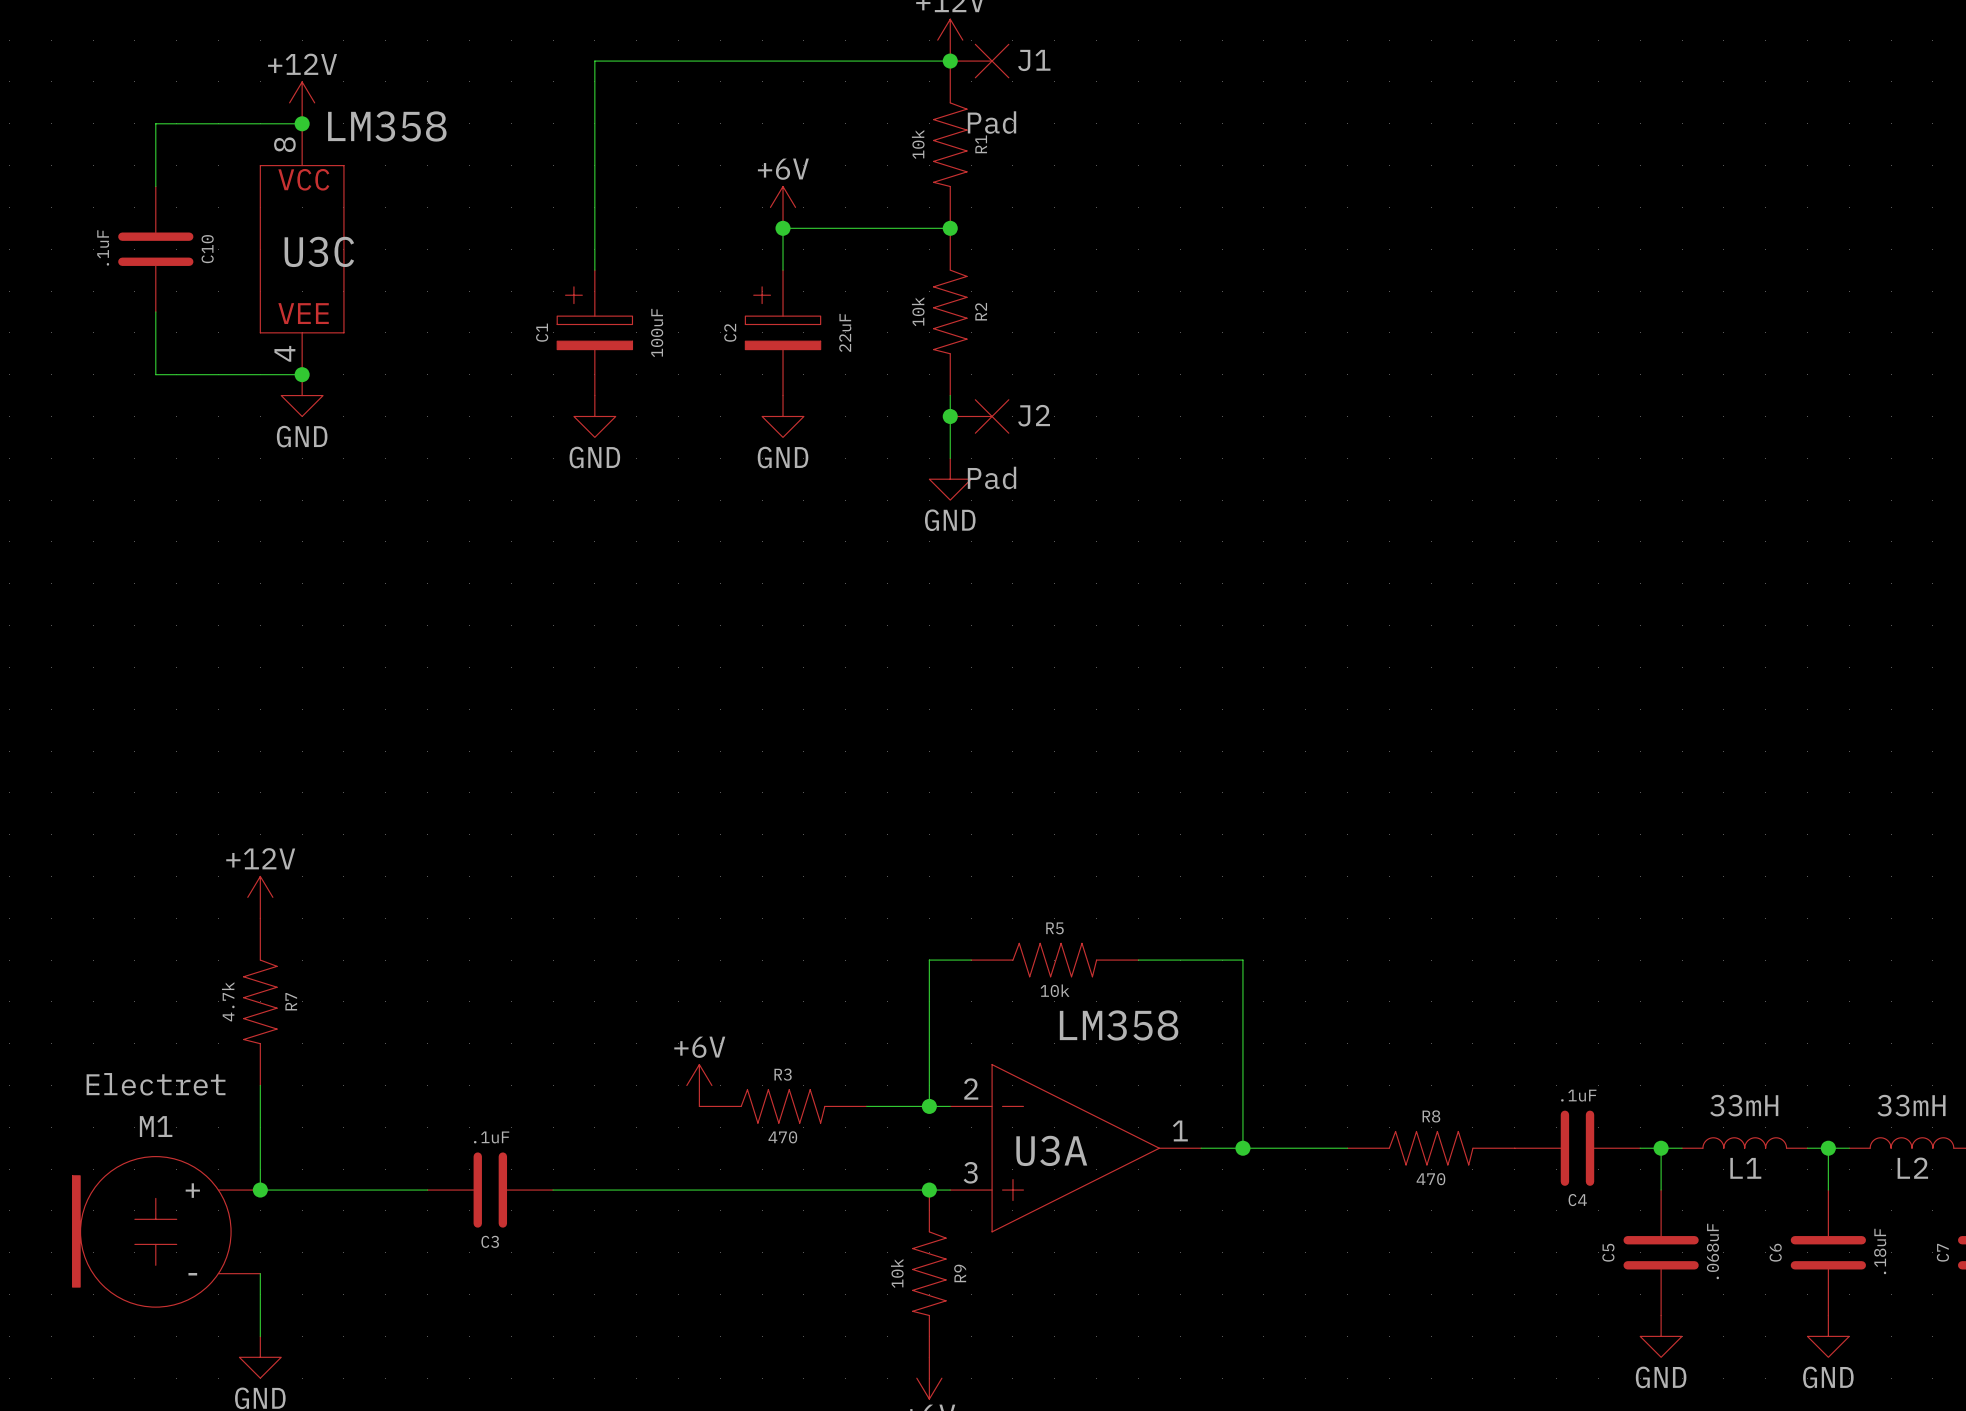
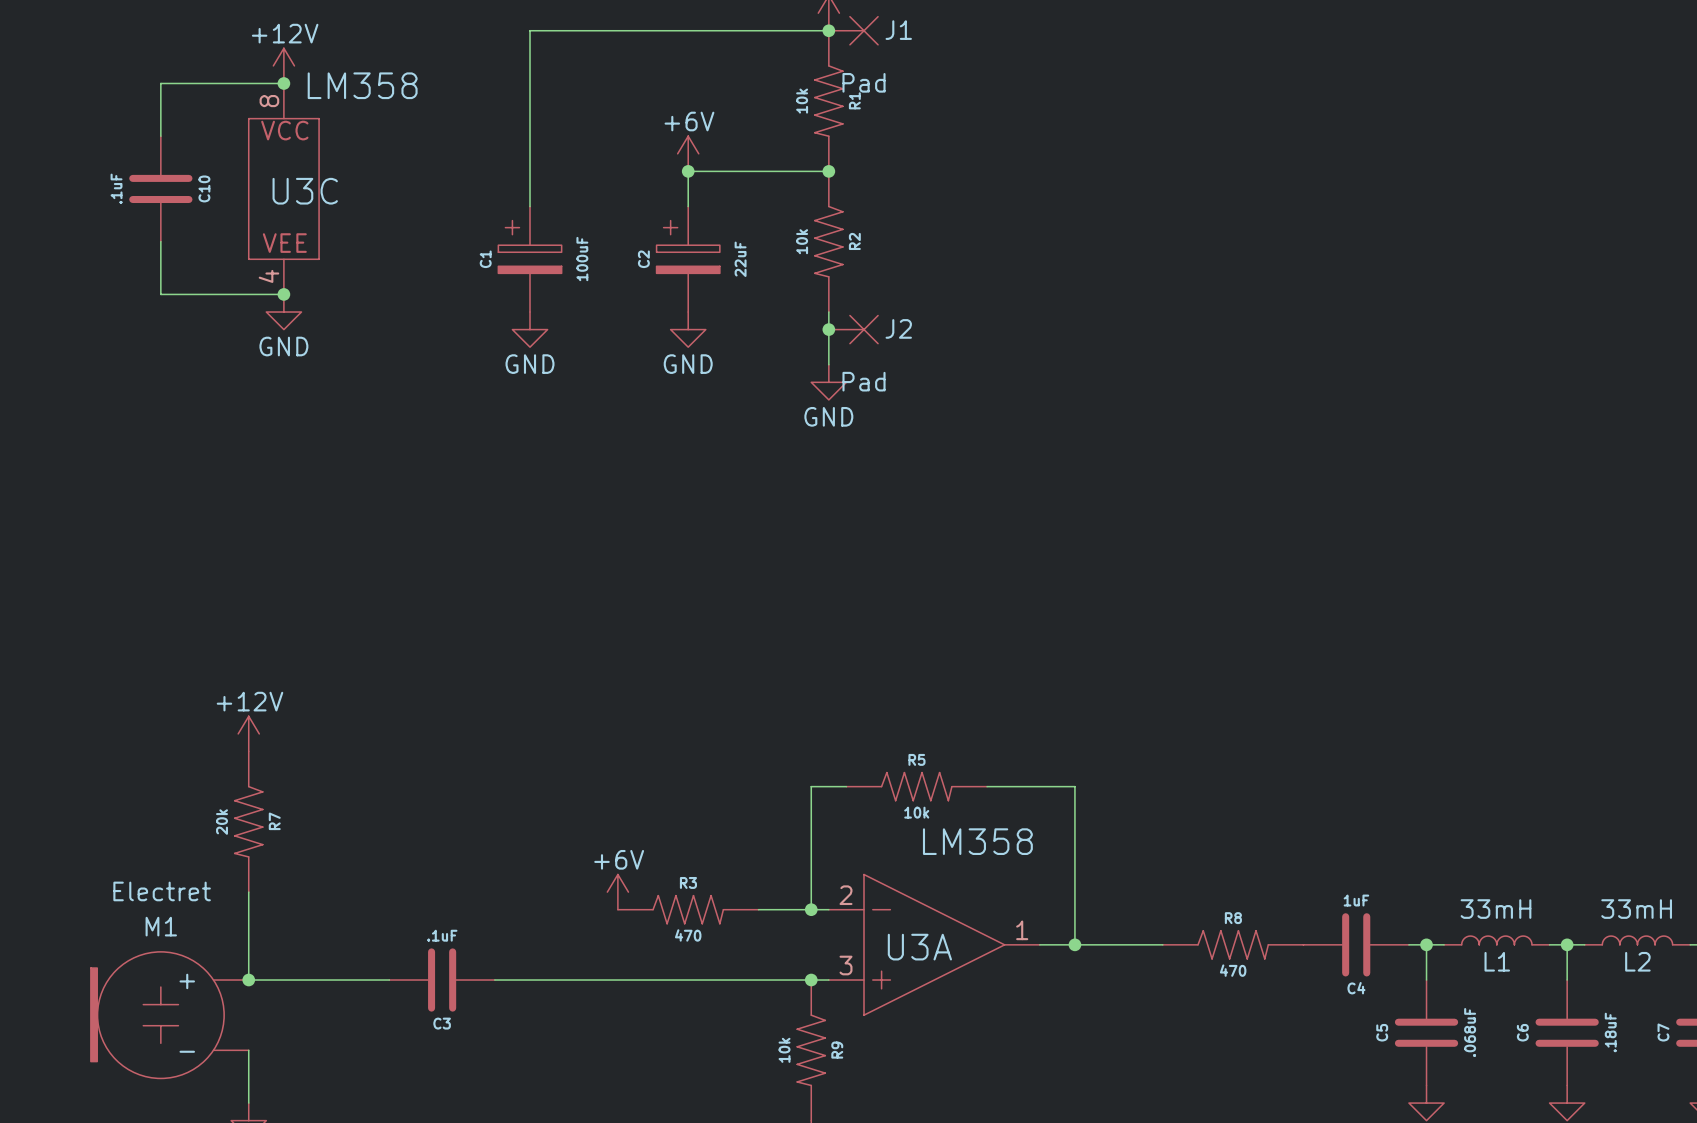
R7 value: 4.7k (228, 1001) -> 20k (222, 822)
C4 value: .1uF (1578, 1095) -> 1uF (1356, 900)

